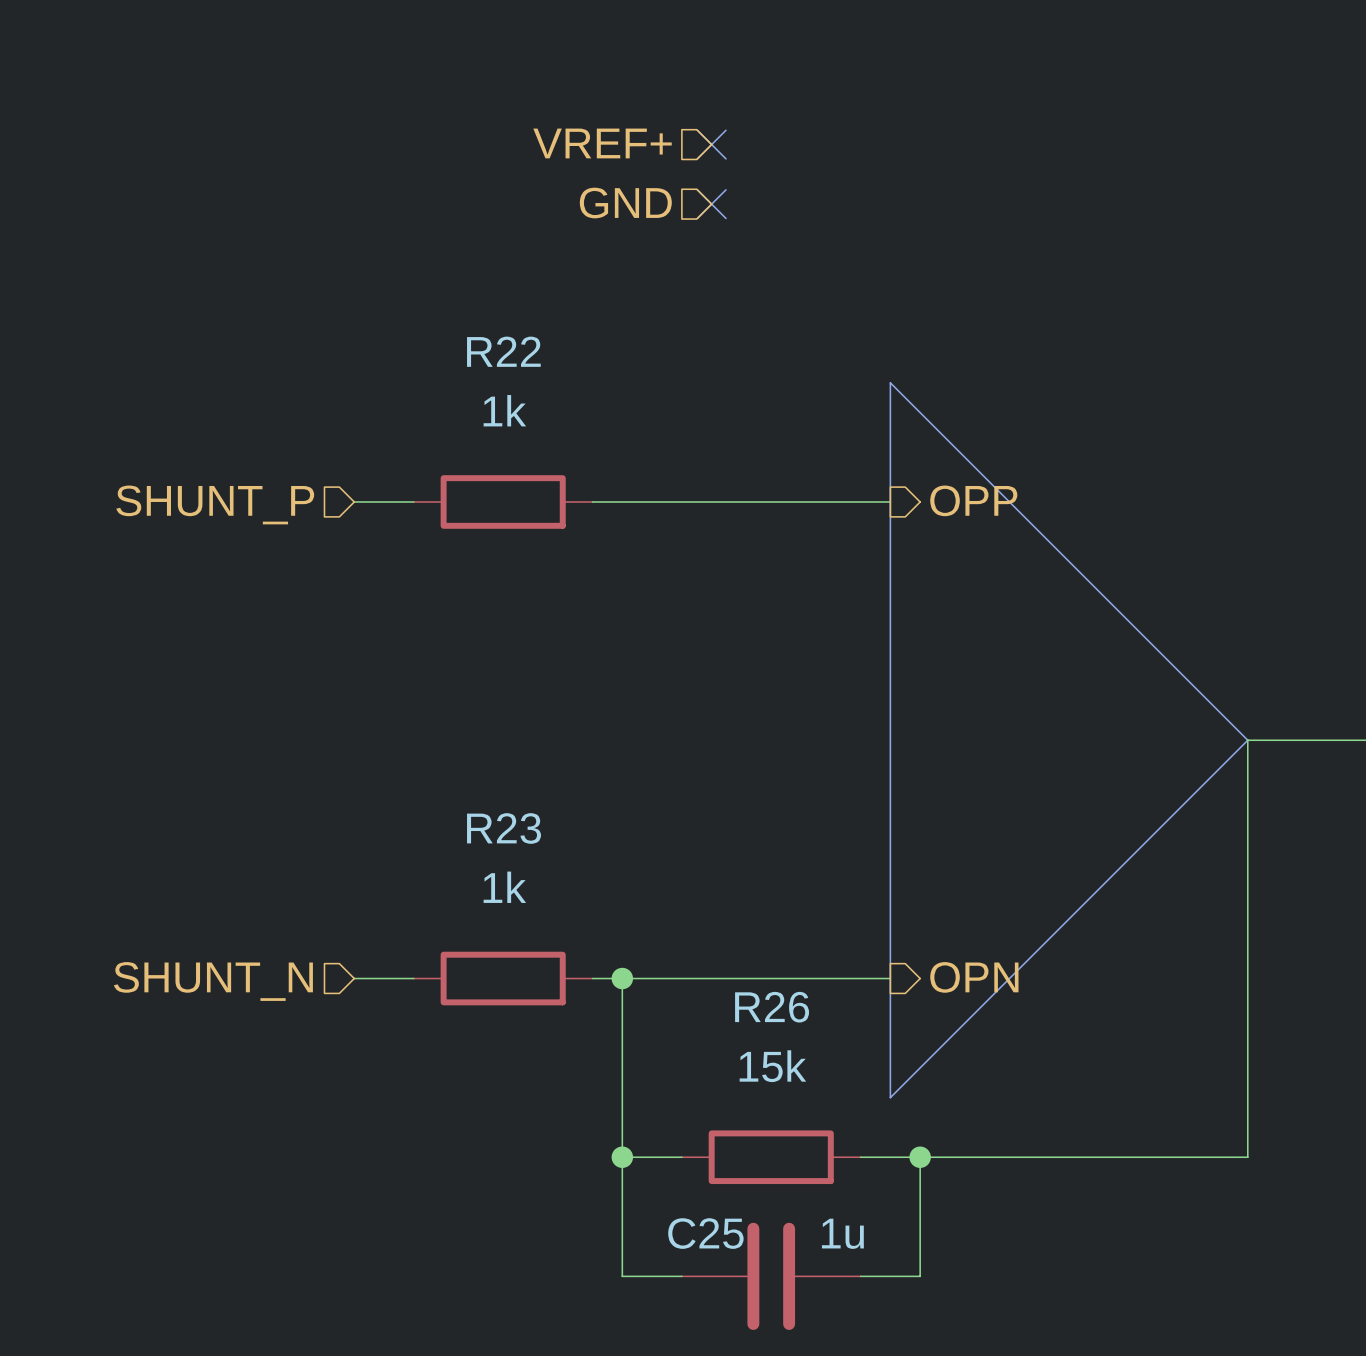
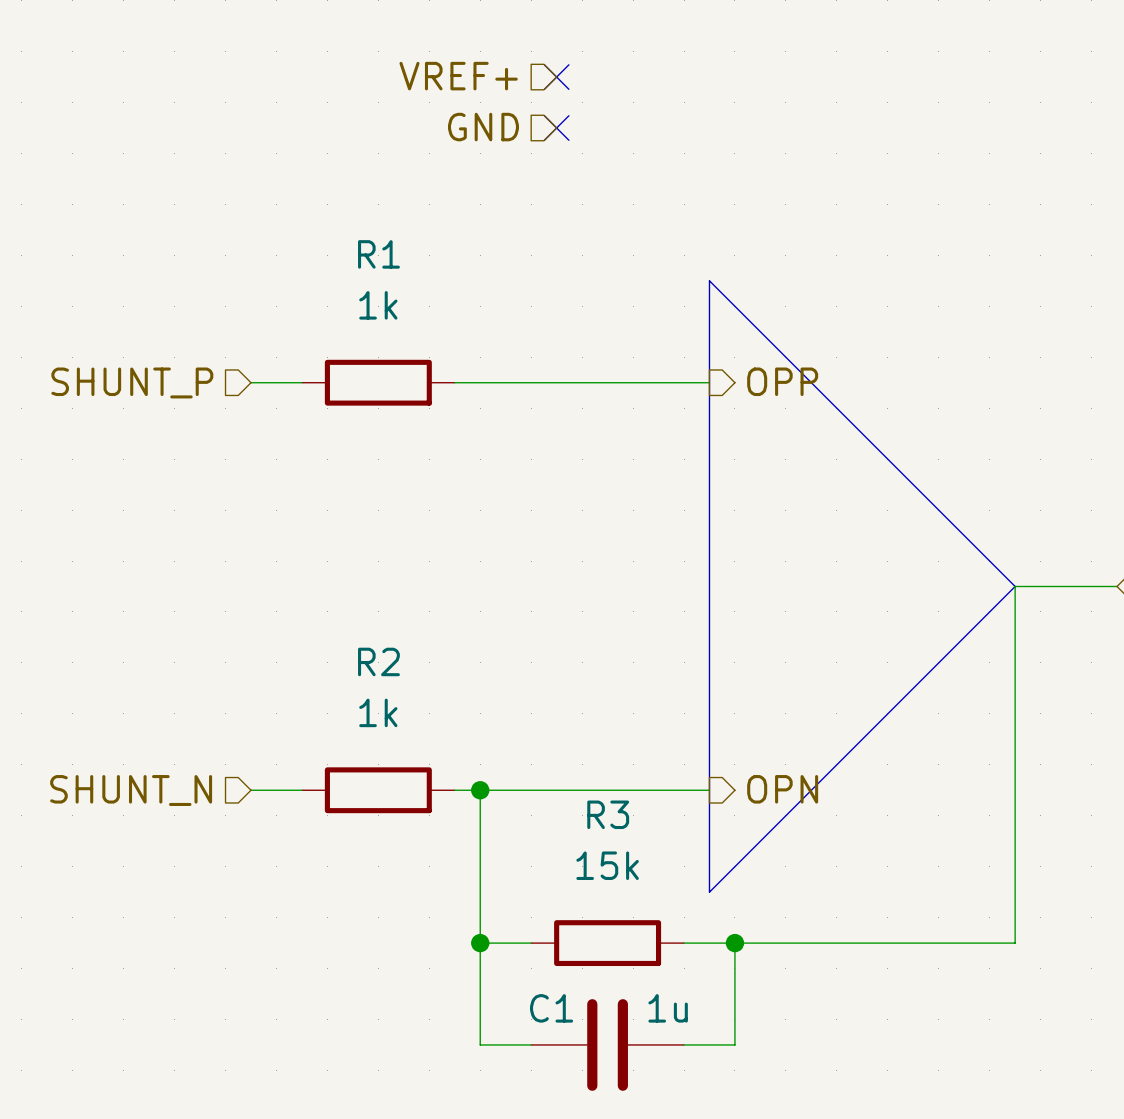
R22 name: R22 (503, 351) -> R1 (378, 254)
R23 name: R23 (504, 828) -> R2 (378, 661)
R26 name: R26 (772, 1007) -> R3 (608, 814)
C25 name: C25 (705, 1233) -> C1 (551, 1008)

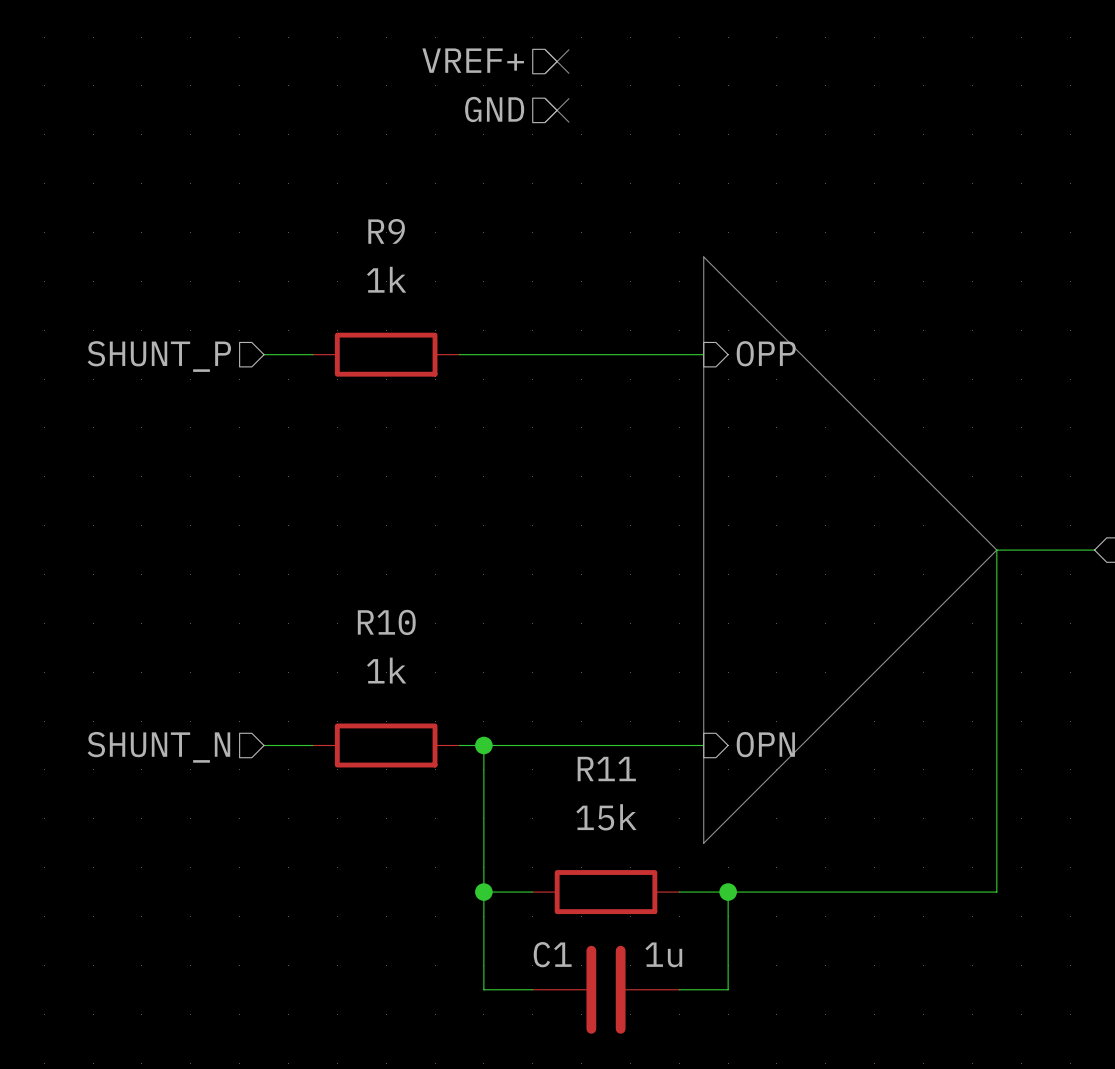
R1 name: R1 (378, 254) -> R9 (386, 231)
R2 name: R2 (378, 661) -> R10 (386, 622)
R3 name: R3 (608, 814) -> R11 (606, 769)

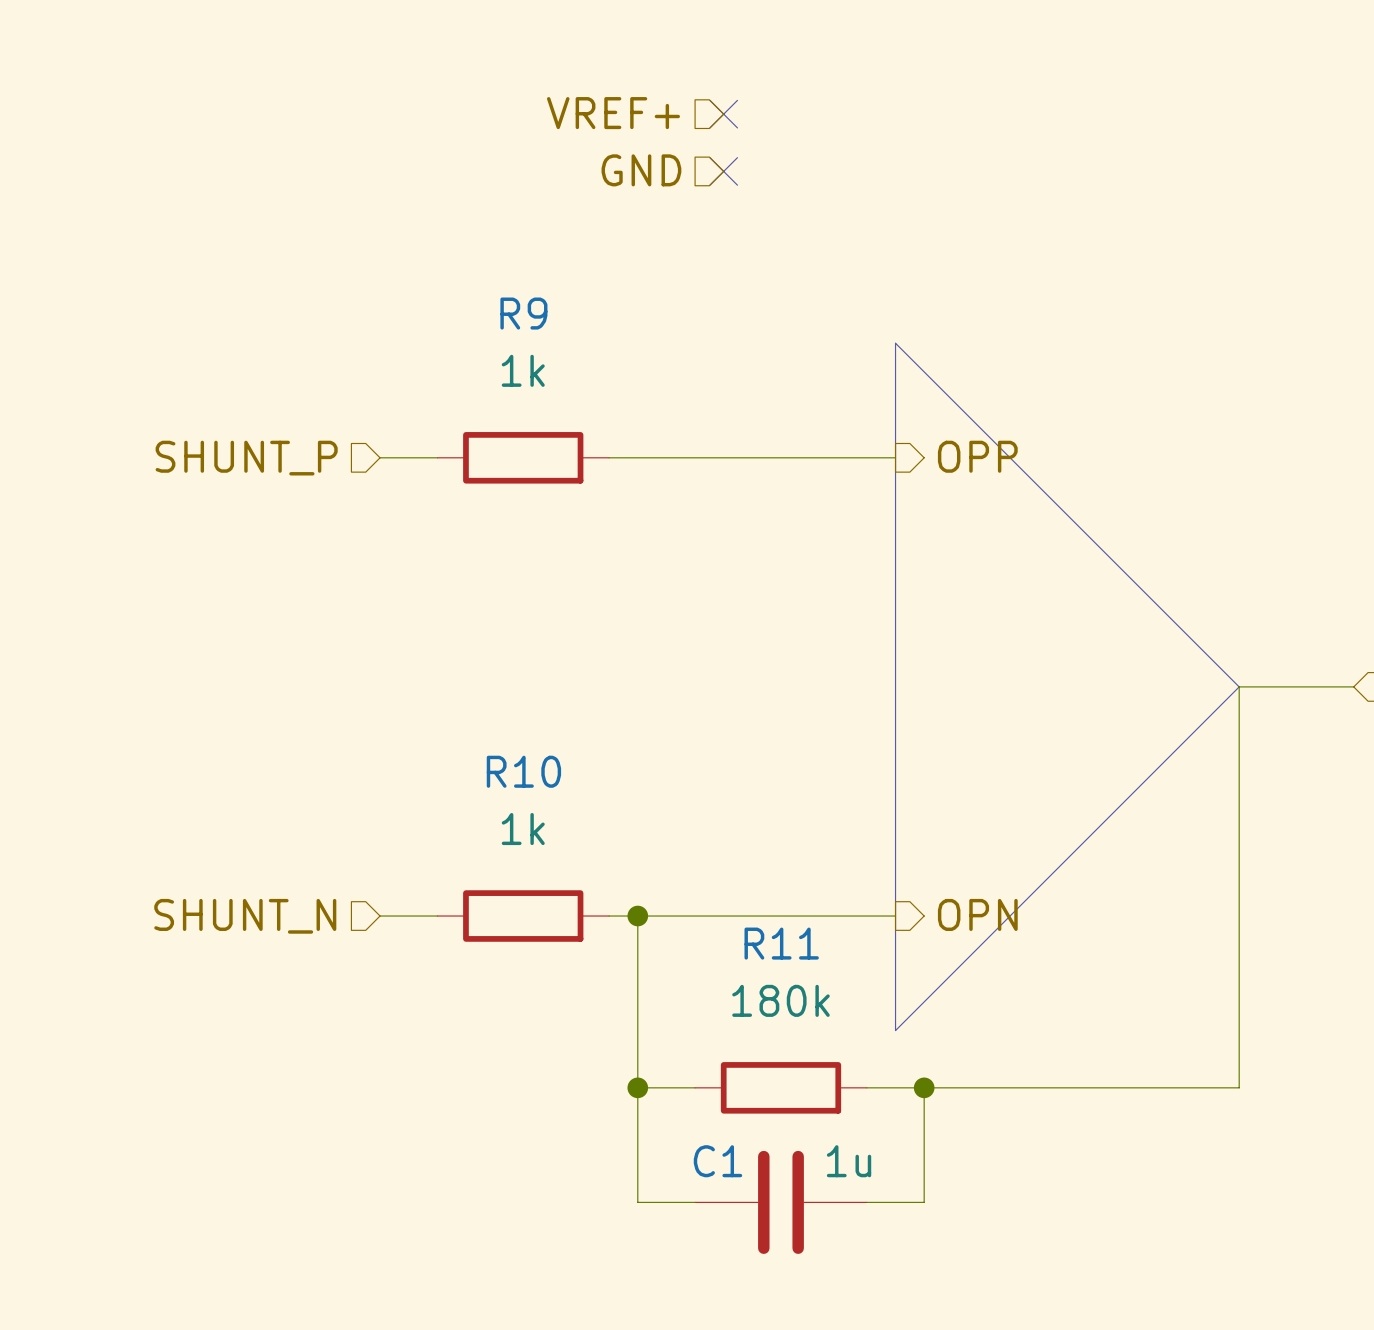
R11 value: 15k (606, 817) -> 180k (780, 1000)

